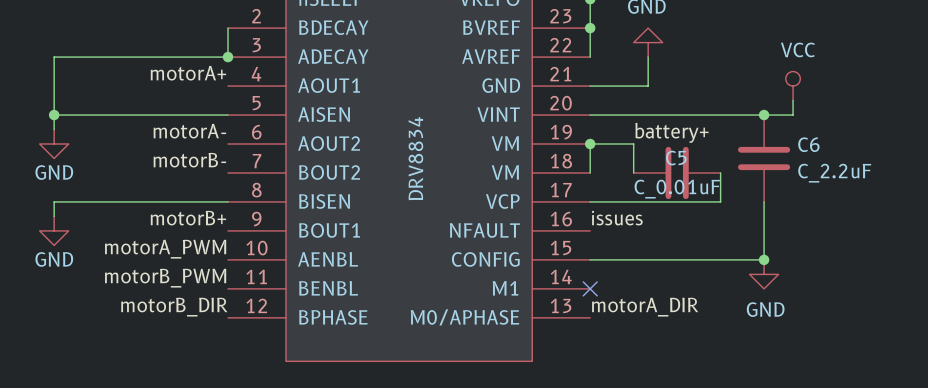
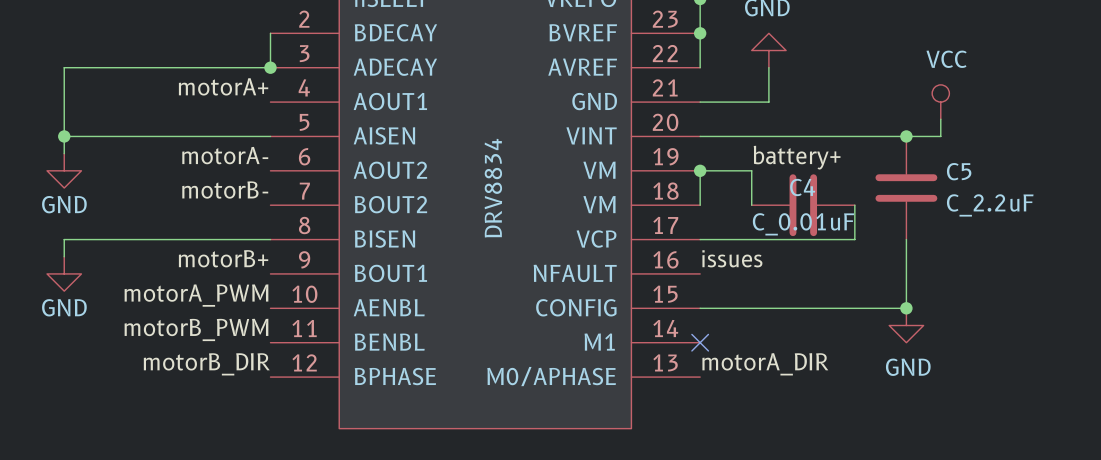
C6 name: C6 (808, 144) -> C5 (959, 171)
C5 name: C5 (676, 158) -> C4 (802, 187)

